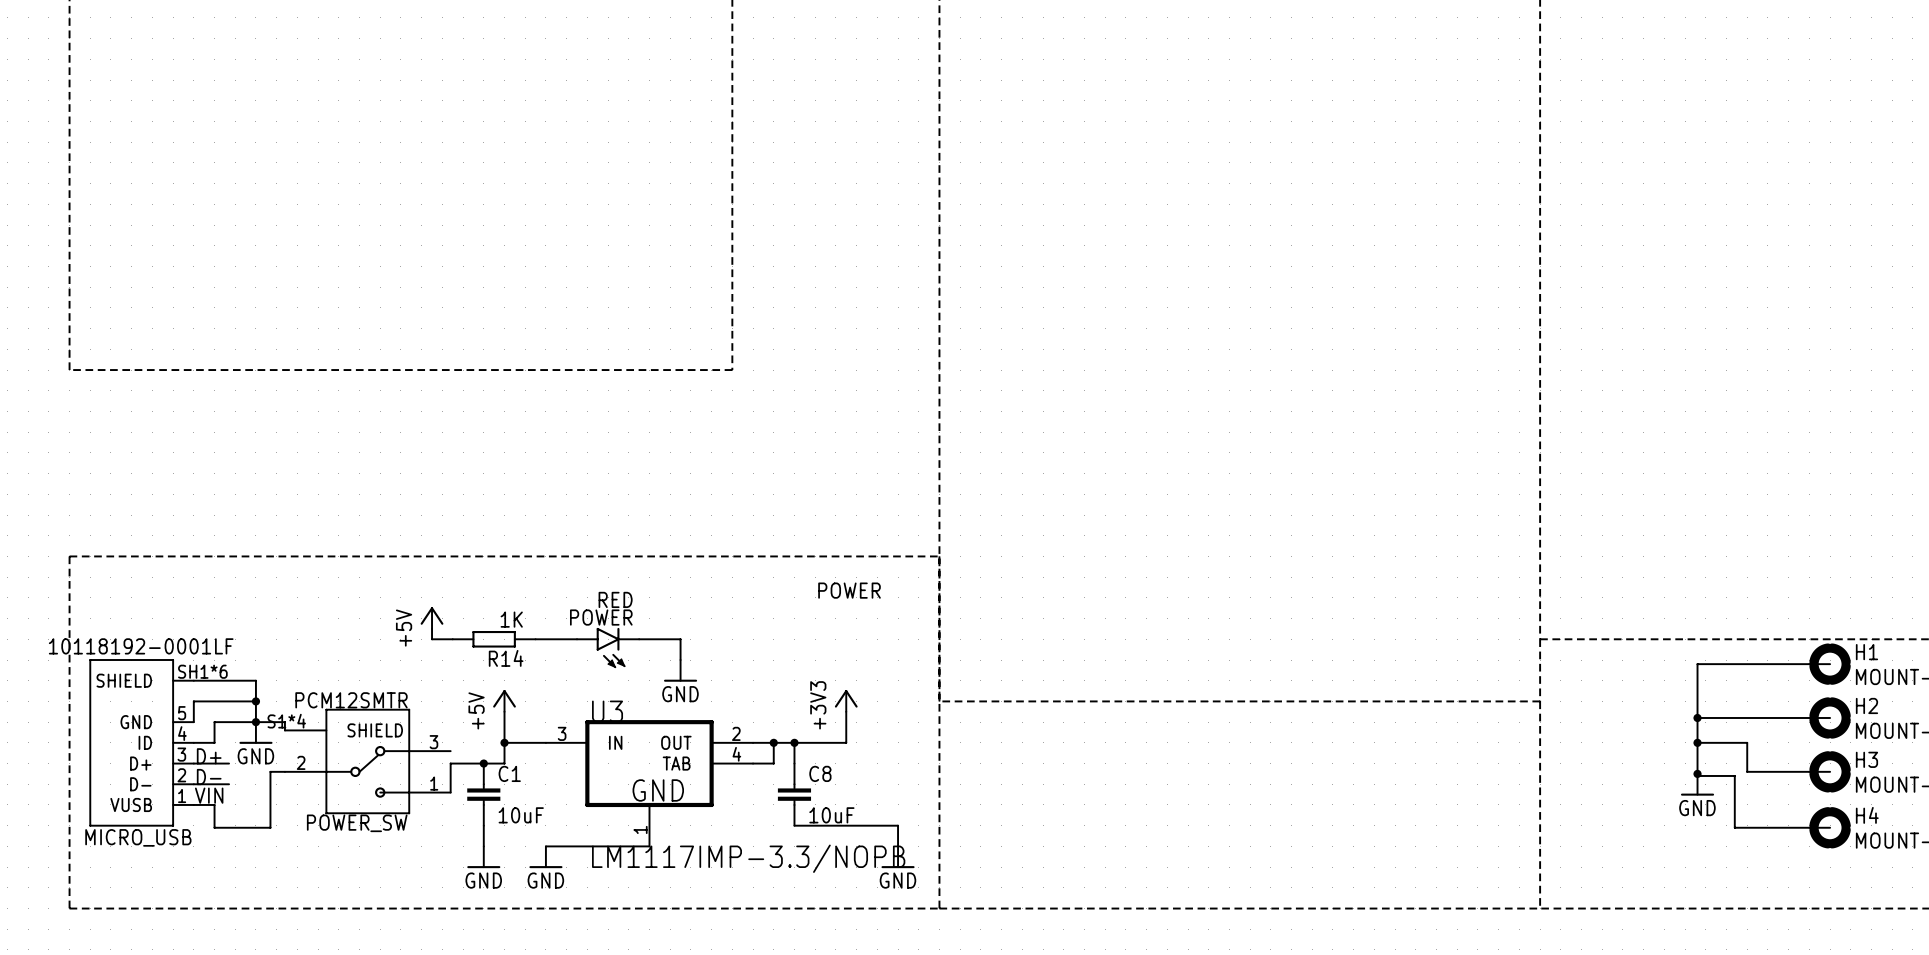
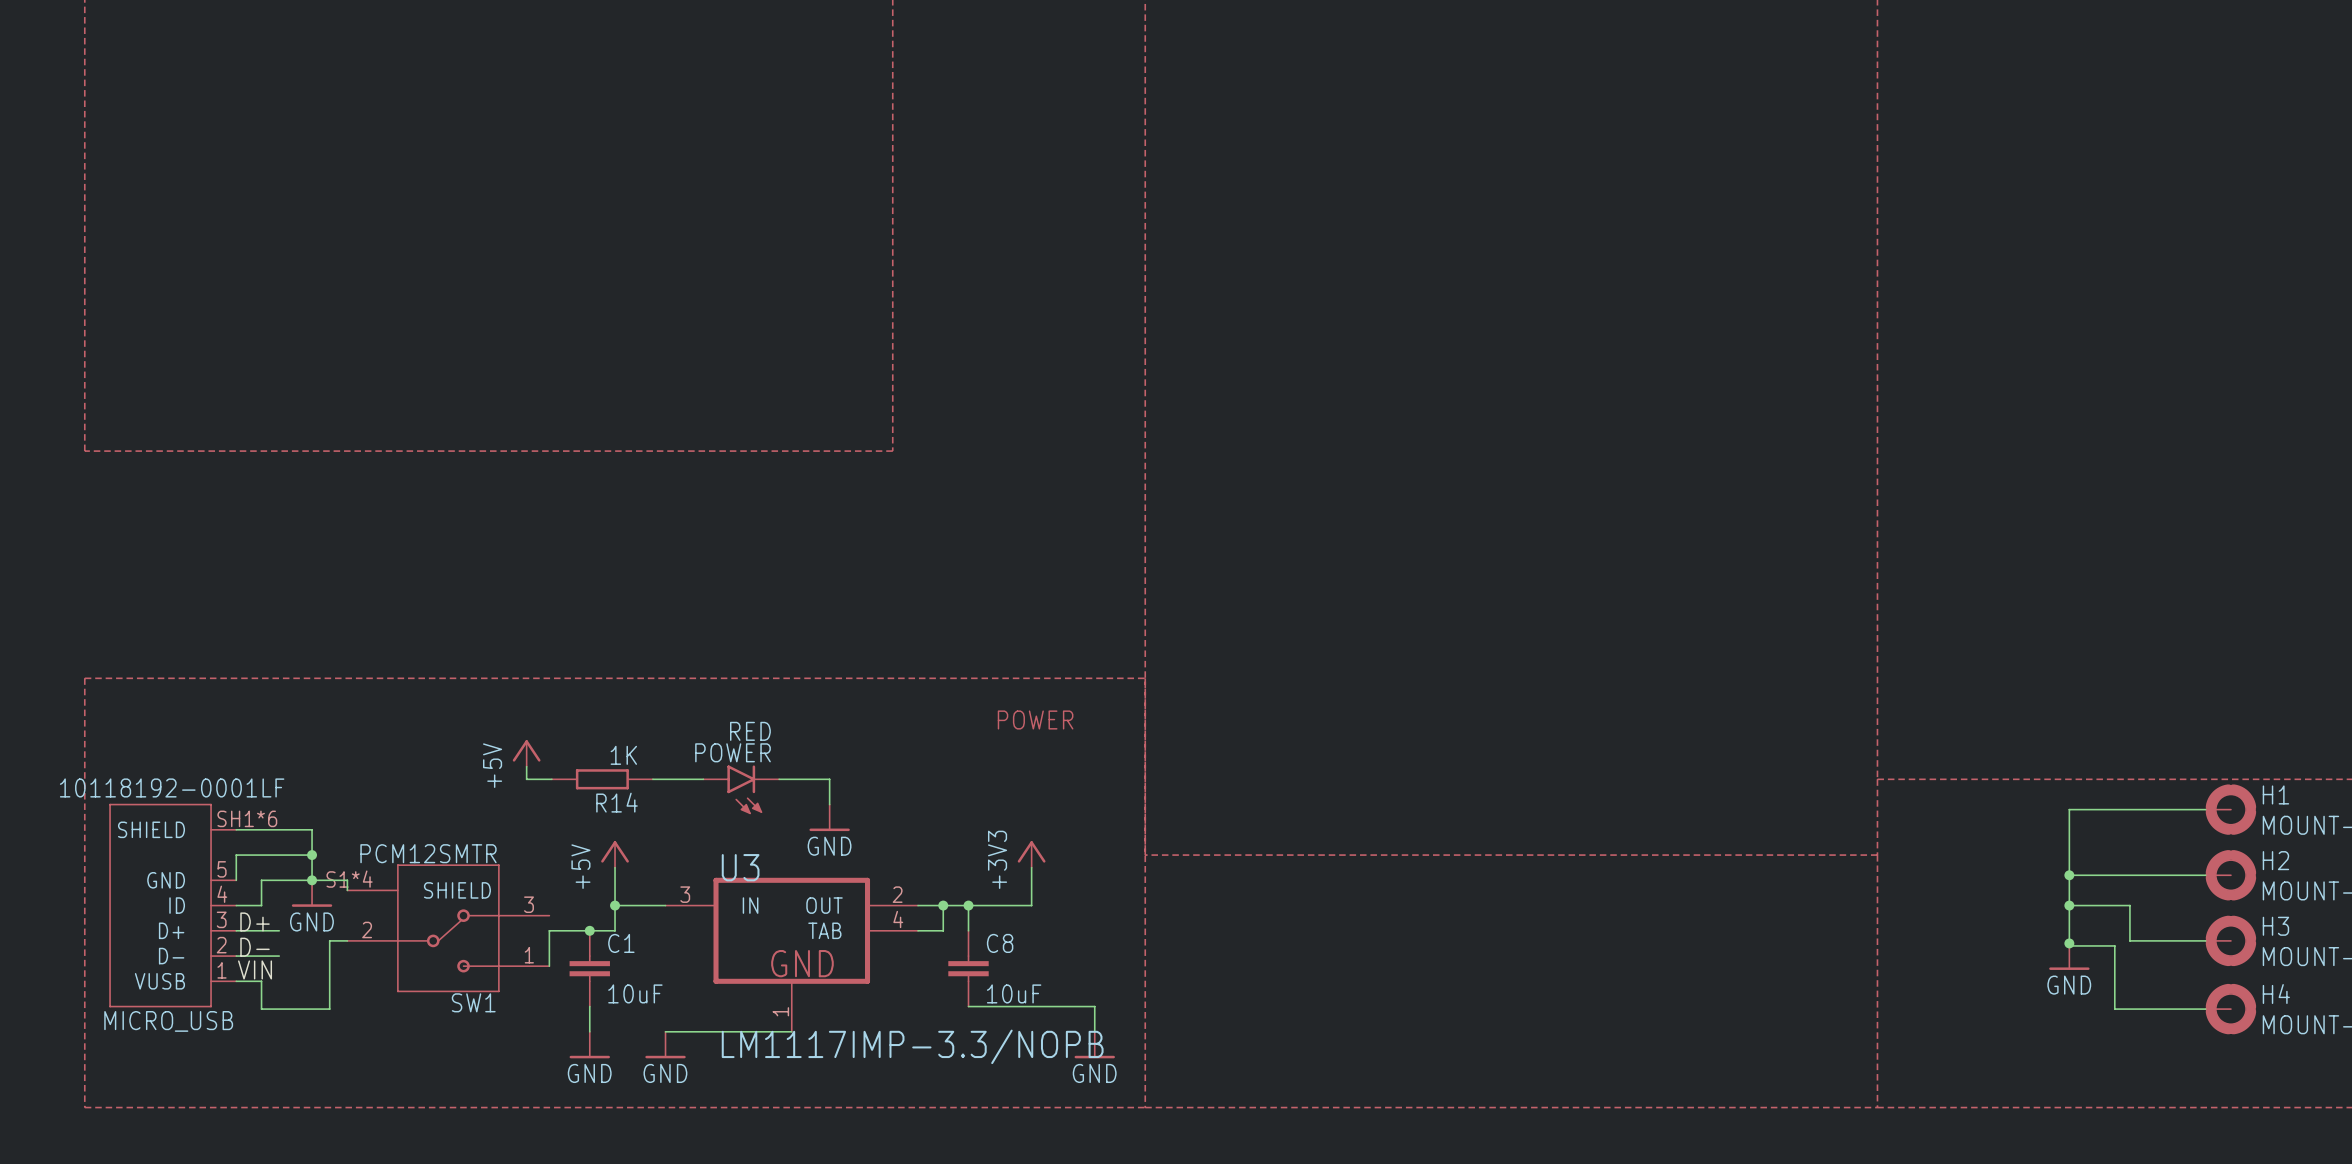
POWER_SW name: POWER_SW (357, 823) -> SW1 (473, 1002)

